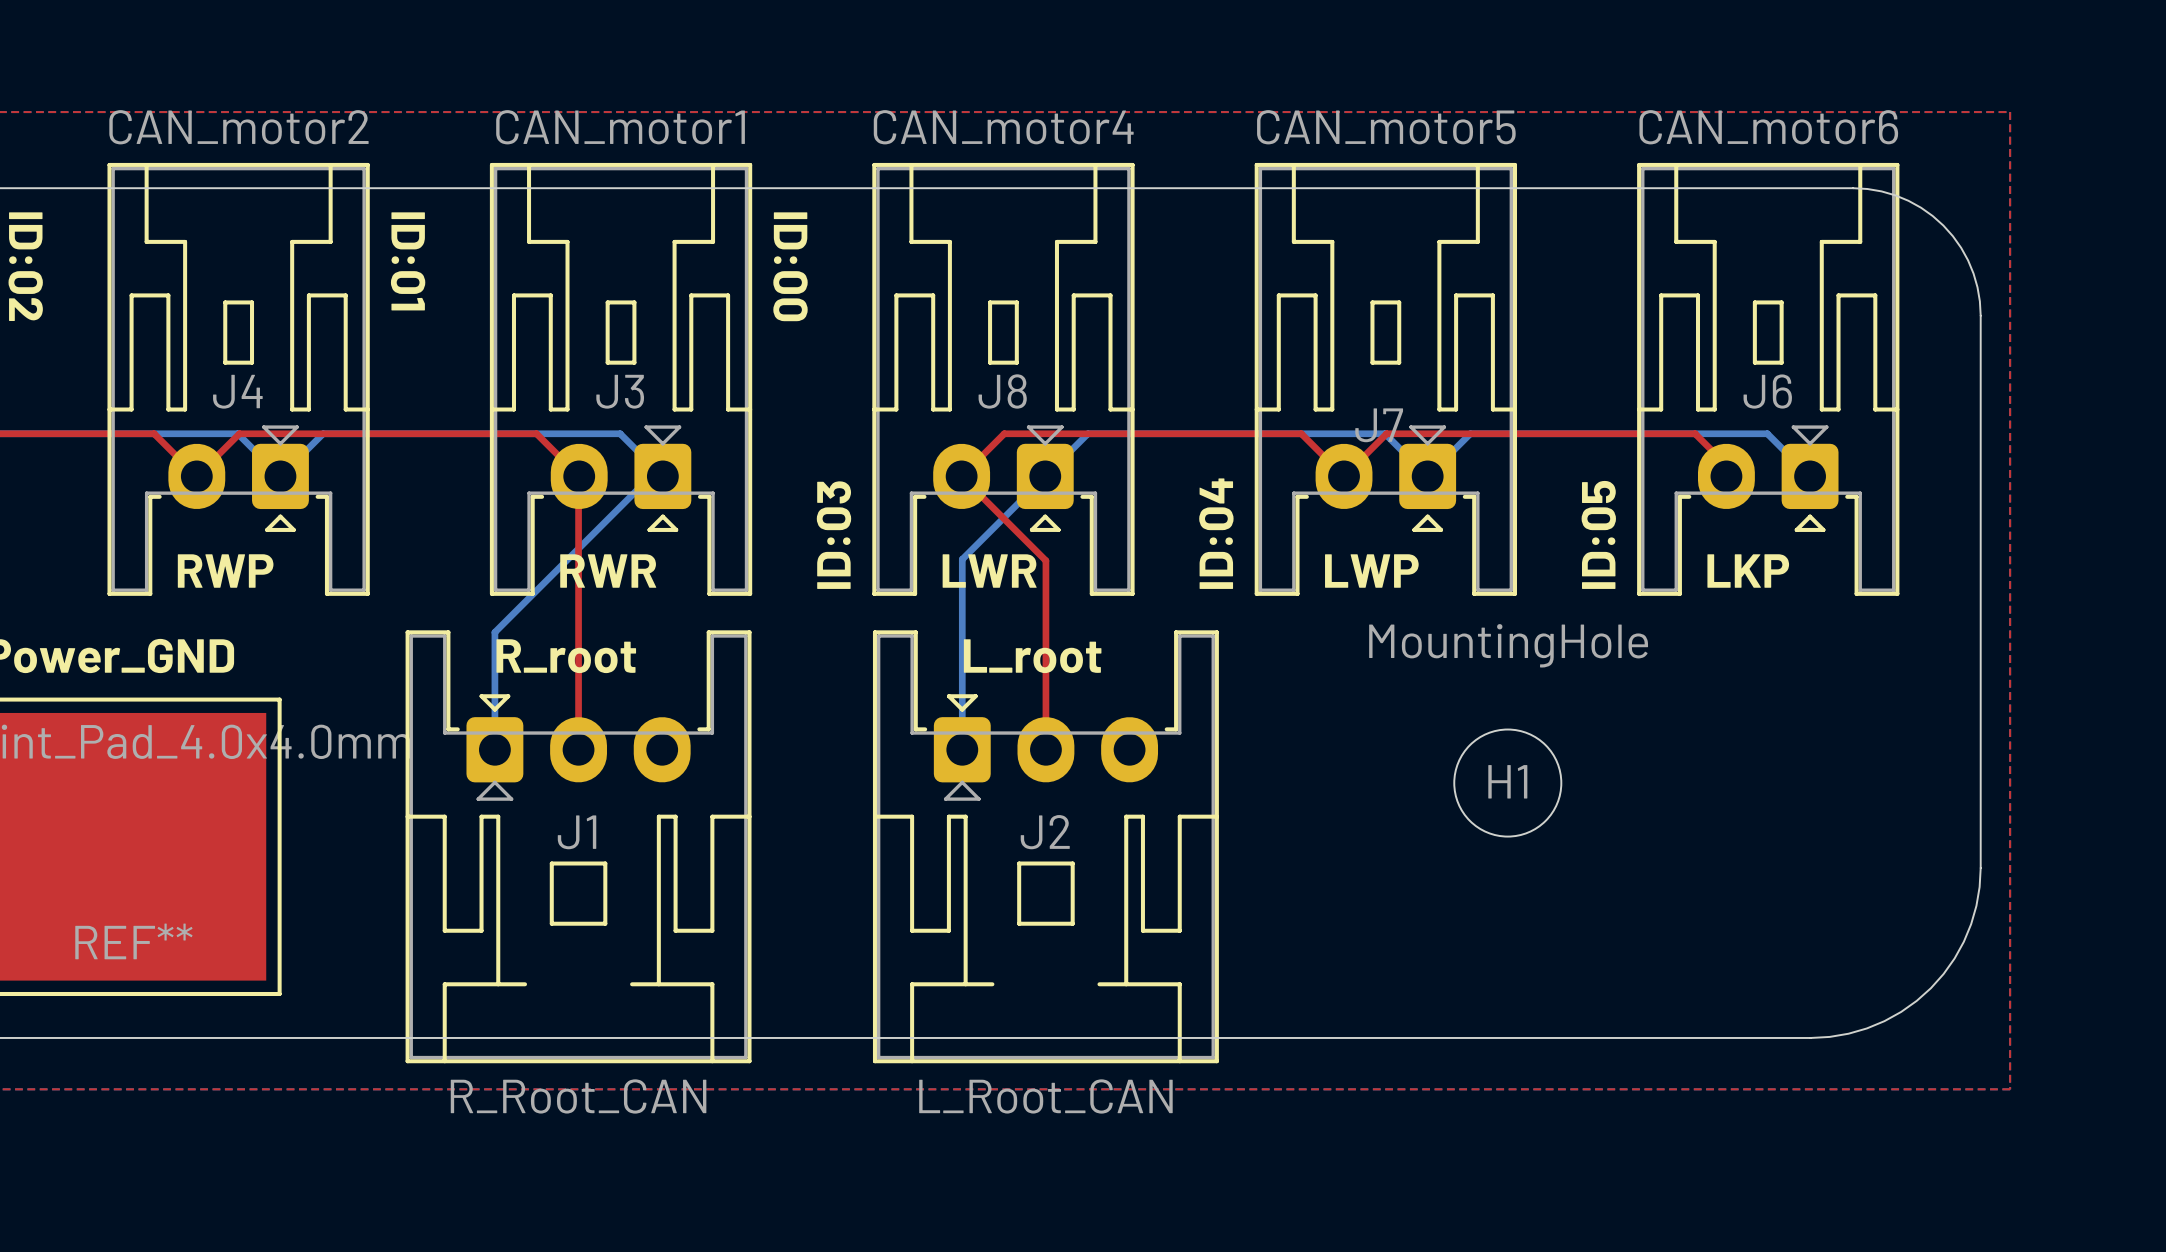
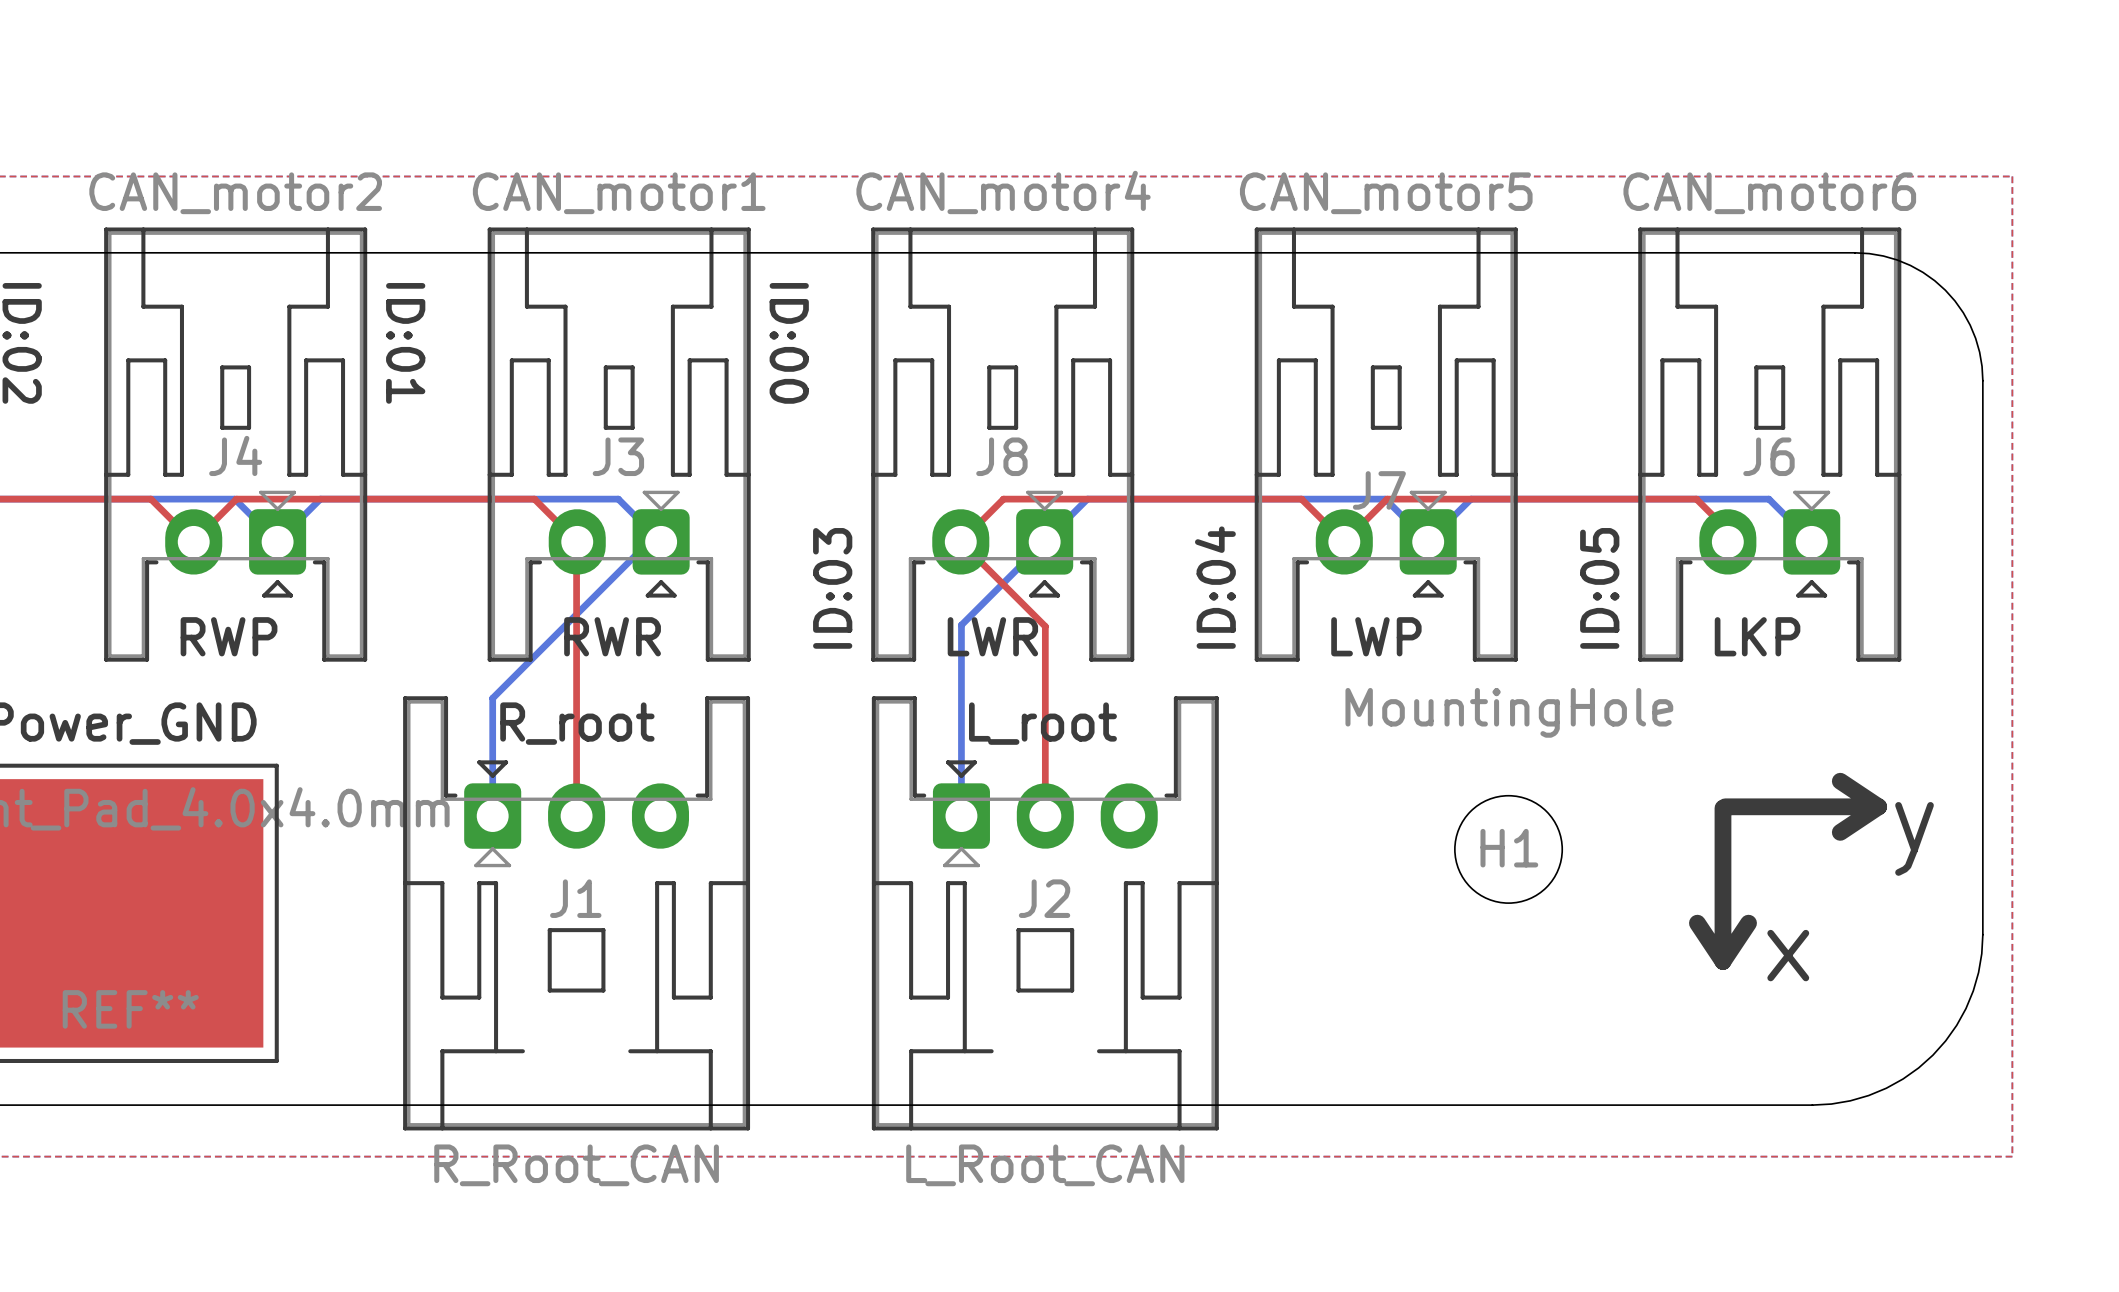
text: none -> ↓ (1801, 806)
text: none -> y (1914, 838)
text: none -> ↓ (1722, 884)
text: none -> x (1788, 955)

